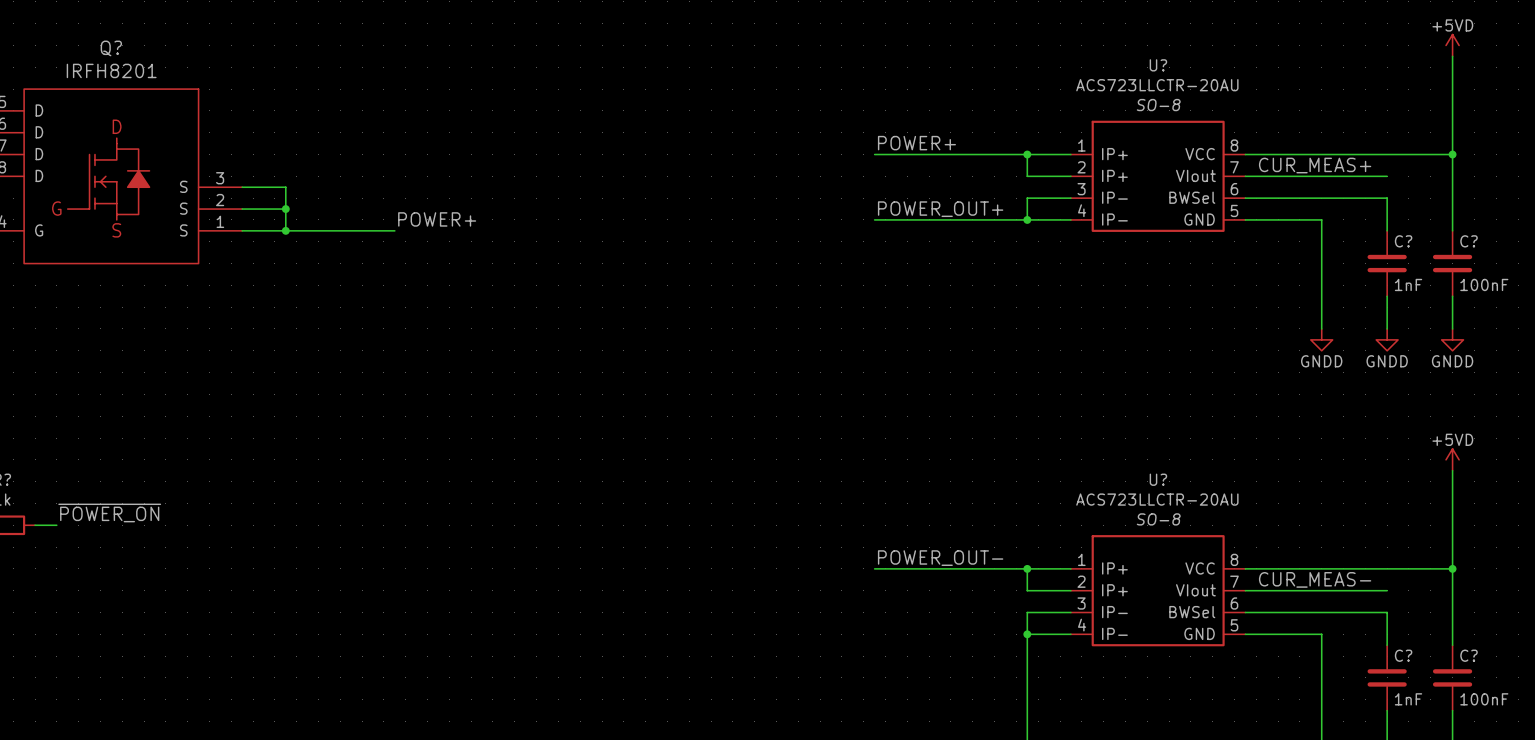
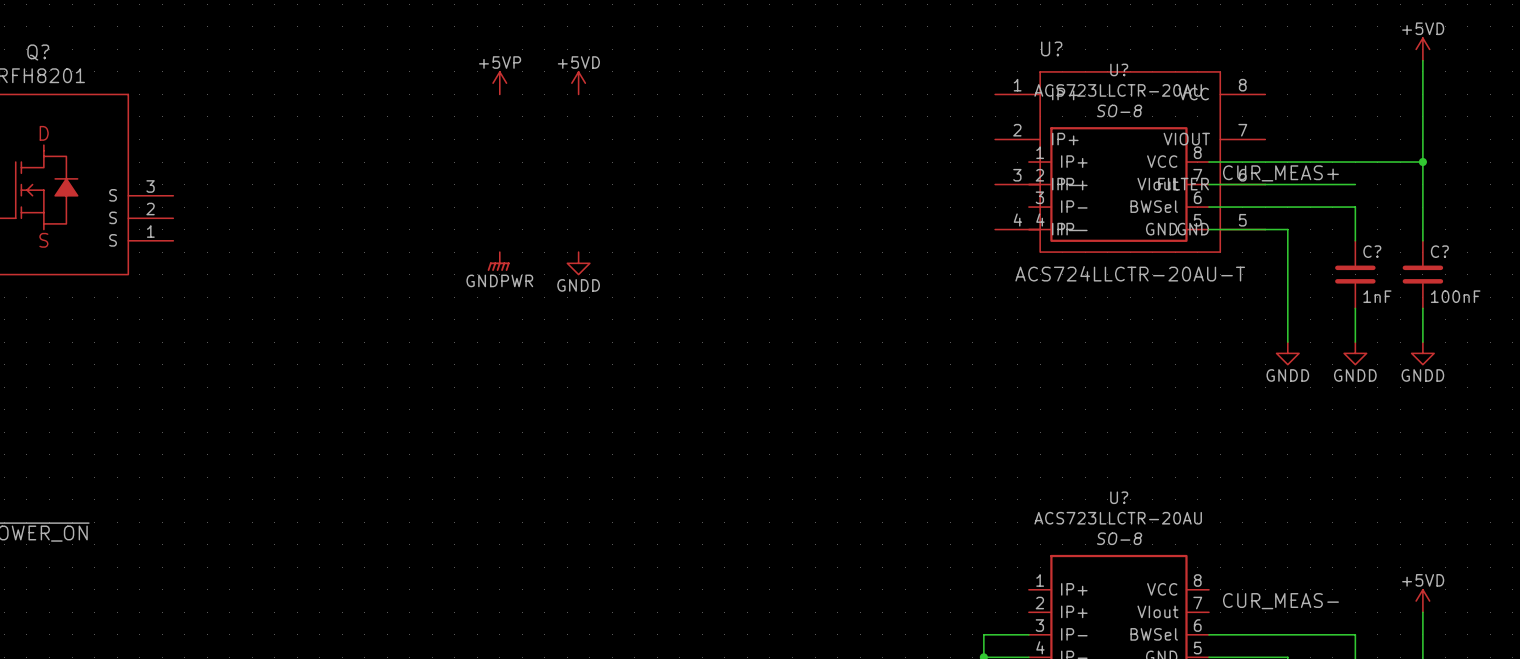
power symbol: none -> +5VP (499, 83)
power symbol: none -> +5VD (578, 83)
label: POWER+ (916, 143) -> none
wire: (874, 154) (1070, 154) -> none
wire: (1027, 154) (1027, 176) (1070, 176) -> none
junction: (1027, 154) -> none
U?: none -> ACS724LLCTR-20AU-T (1130, 162)
wire: (242, 187) (285, 187) (285, 230) -> none
wire: (1070, 198) (1027, 198) (1027, 219) -> none
wire: (242, 209) (285, 209) -> none
junction: (285, 209) -> none
label: POWER_OUT+ (940, 209) -> none
label: POWER+ (437, 219) -> none
wire: (874, 219) (1070, 219) -> none
junction: (1027, 219) -> none
wire: (242, 230) (394, 230) -> none
junction: (285, 230) -> none
power symbol: none -> GNDPWR (498, 261)
power symbol: none -> GNDD (578, 263)
power symbol position: +5VD (1452, 459) -> +5VD (1422, 601)
wire: (1452, 470) (1452, 590) -> none
label: POWER_OUT- (940, 558) -> none
wire: (874, 568) (1070, 568) -> none
wire: (1027, 568) (1027, 590) (1070, 590) -> none
junction: (1027, 568) -> none
wire: (1245, 568) (1452, 568) -> none
junction: (1452, 568) -> none
wire: (1245, 590) (1387, 590) -> none

